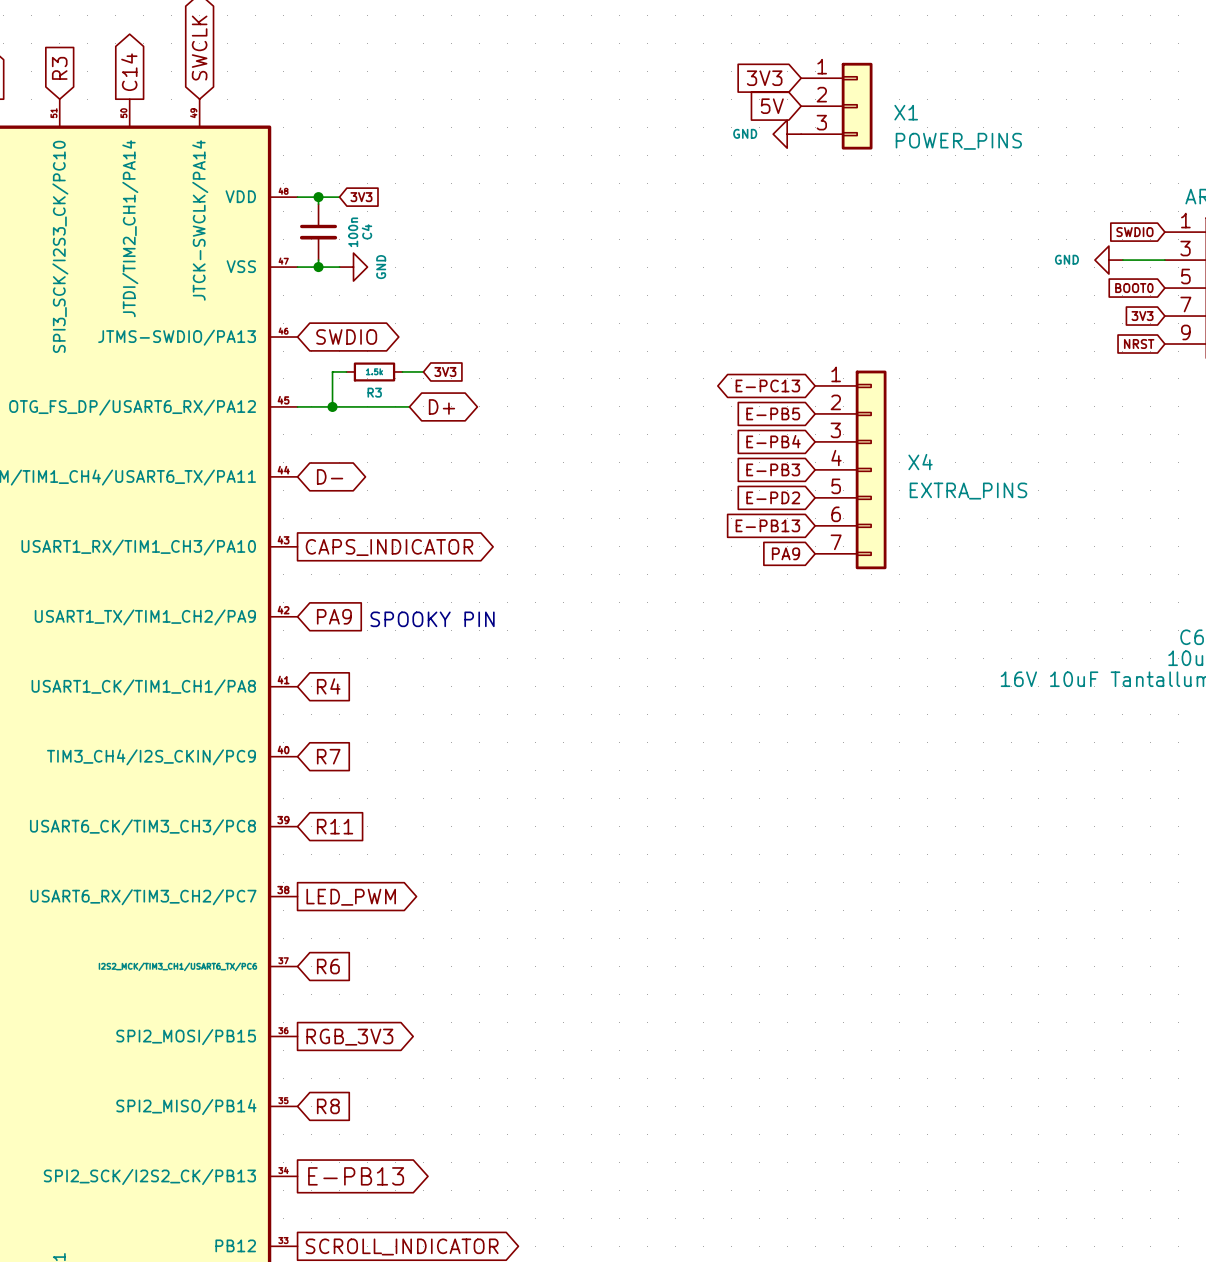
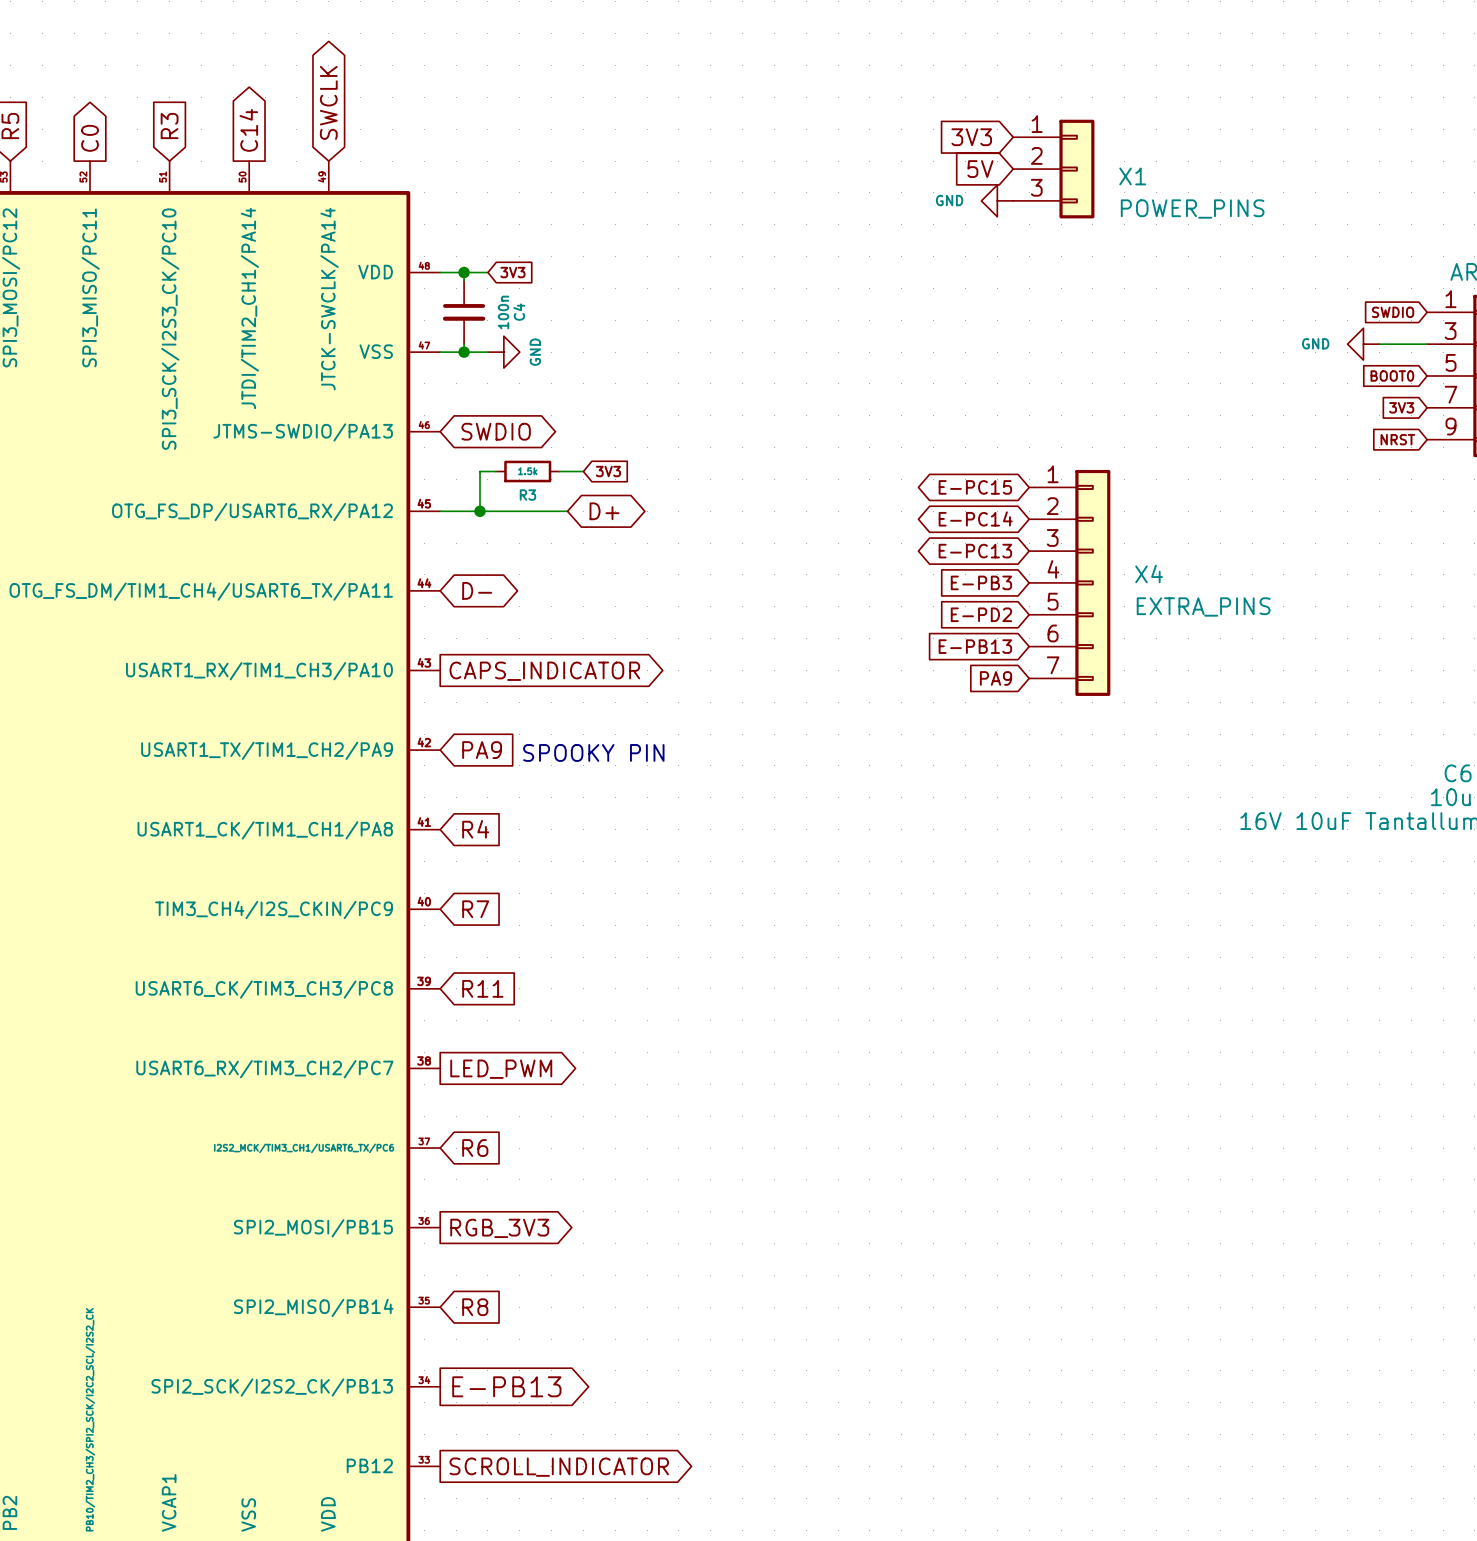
global label: E-PC13 (767, 385) -> E-PC15 (975, 487)
global label shape: input (773, 413) -> bidirectional (975, 518)
global label: E-PB5 (773, 413) -> E-PC14 (975, 518)
global label shape: input (773, 441) -> bidirectional (975, 551)
global label: E-PB4 (773, 441) -> E-PC13 (975, 551)

